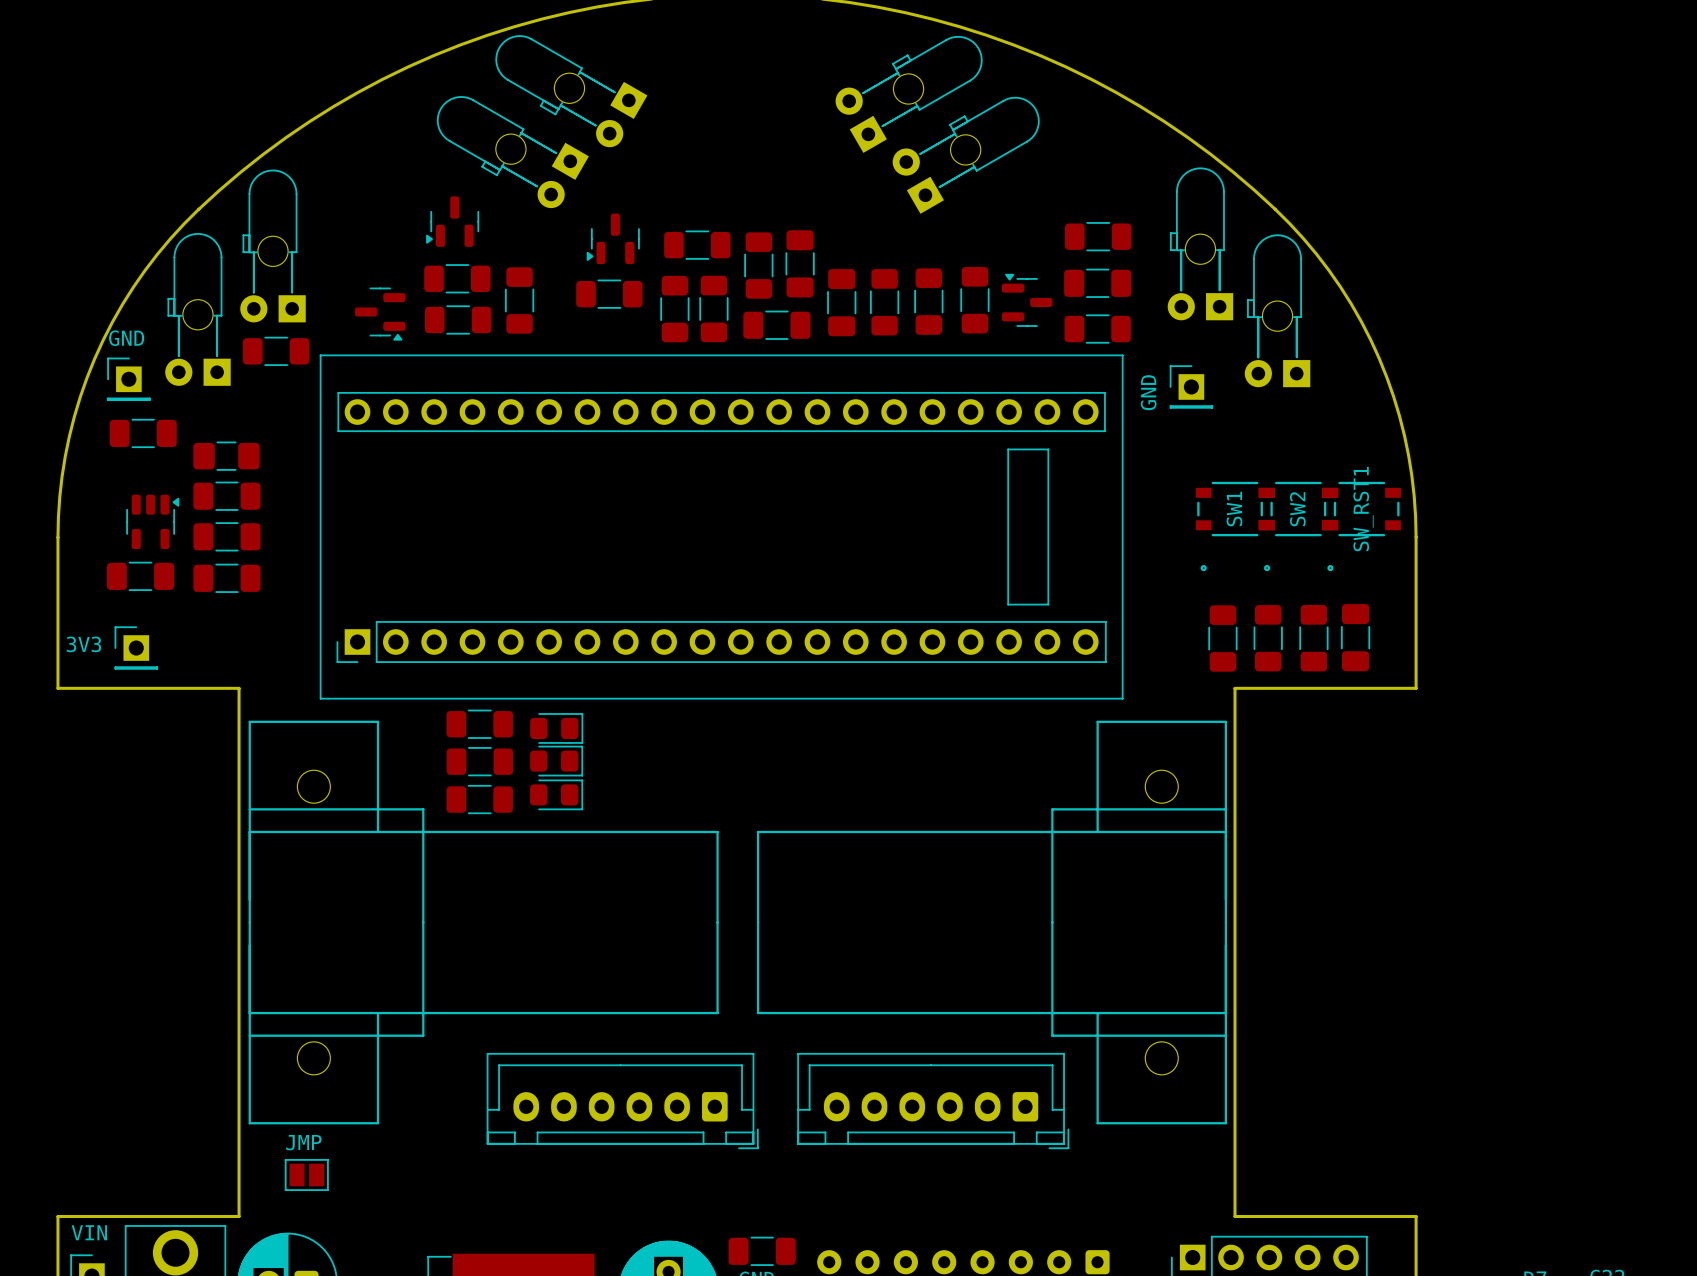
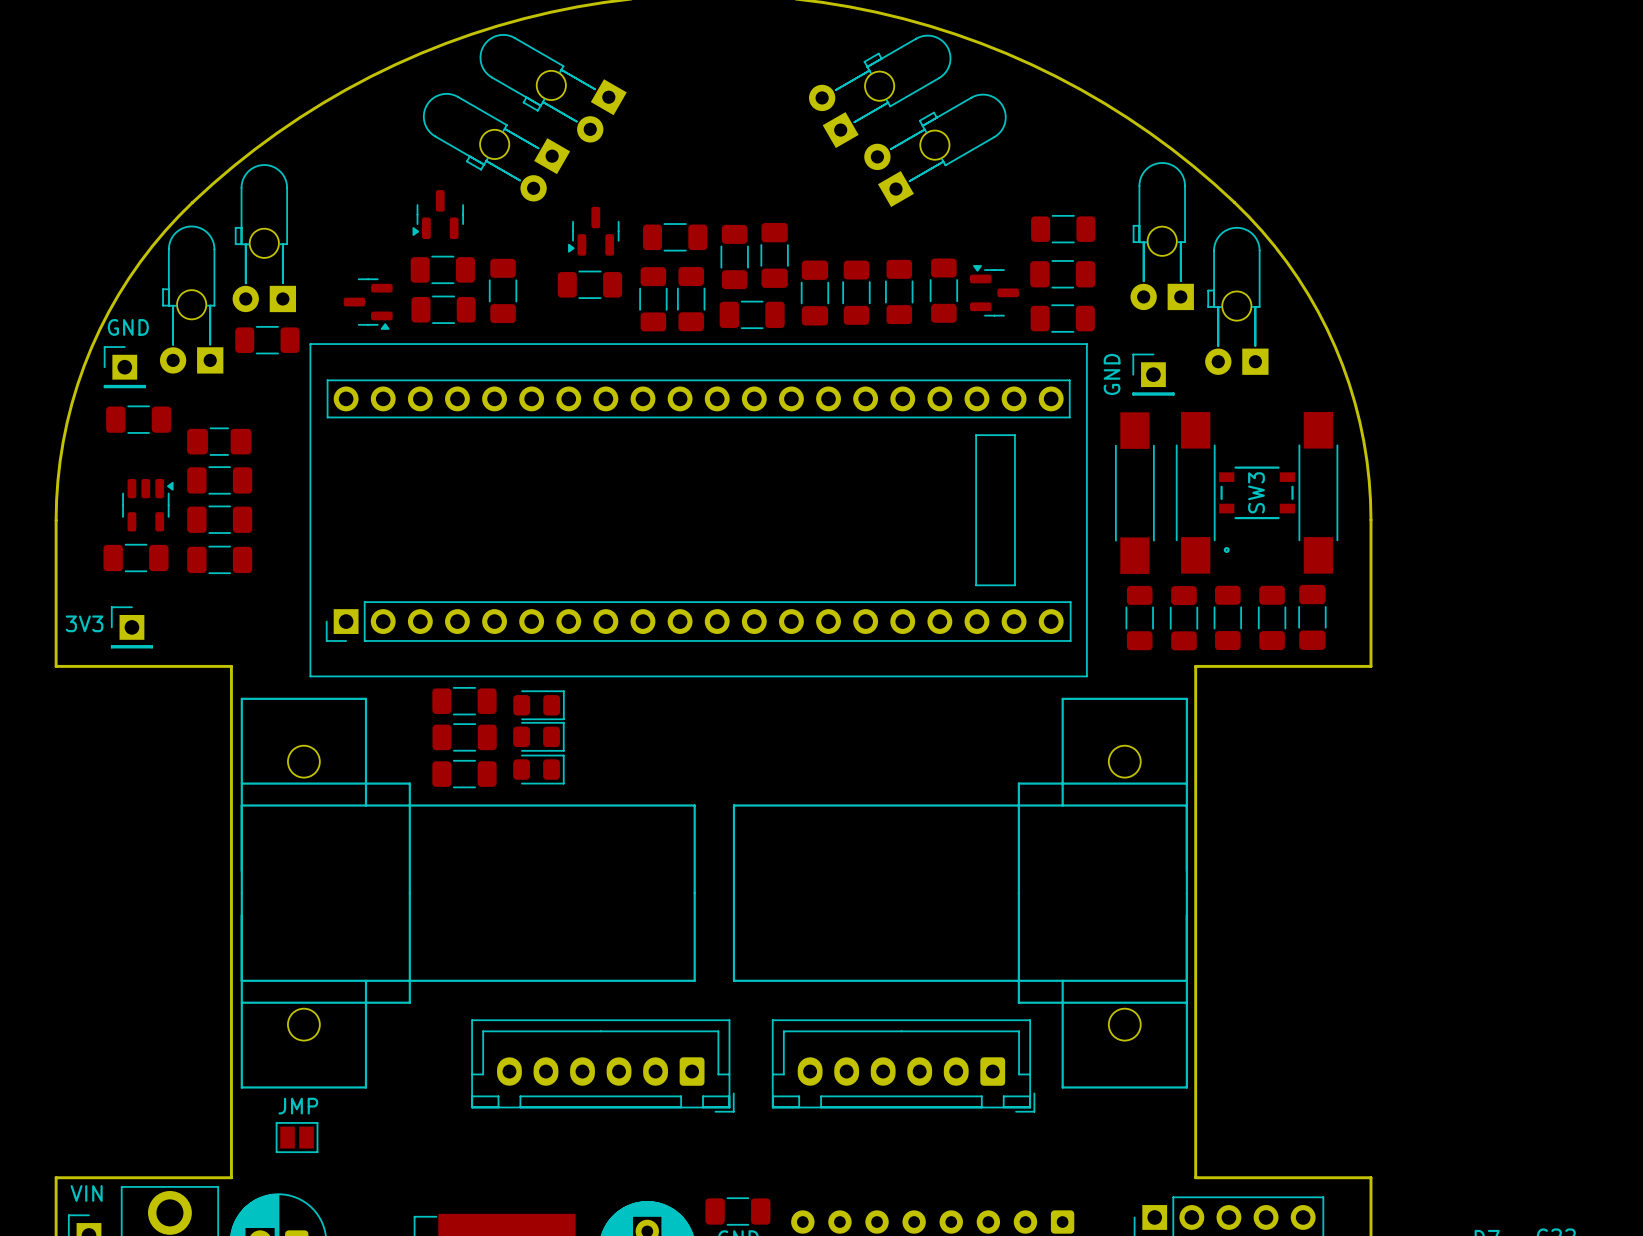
part: none -> (1134, 493)
part: none -> (1195, 492)
SW2 name: SW2 (1297, 509) -> SW3 (1256, 492)
part: none -> (1318, 492)
SW1: (1235, 526) -> none
SW_RST1: (1361, 526) -> none
part: none -> (1139, 618)

